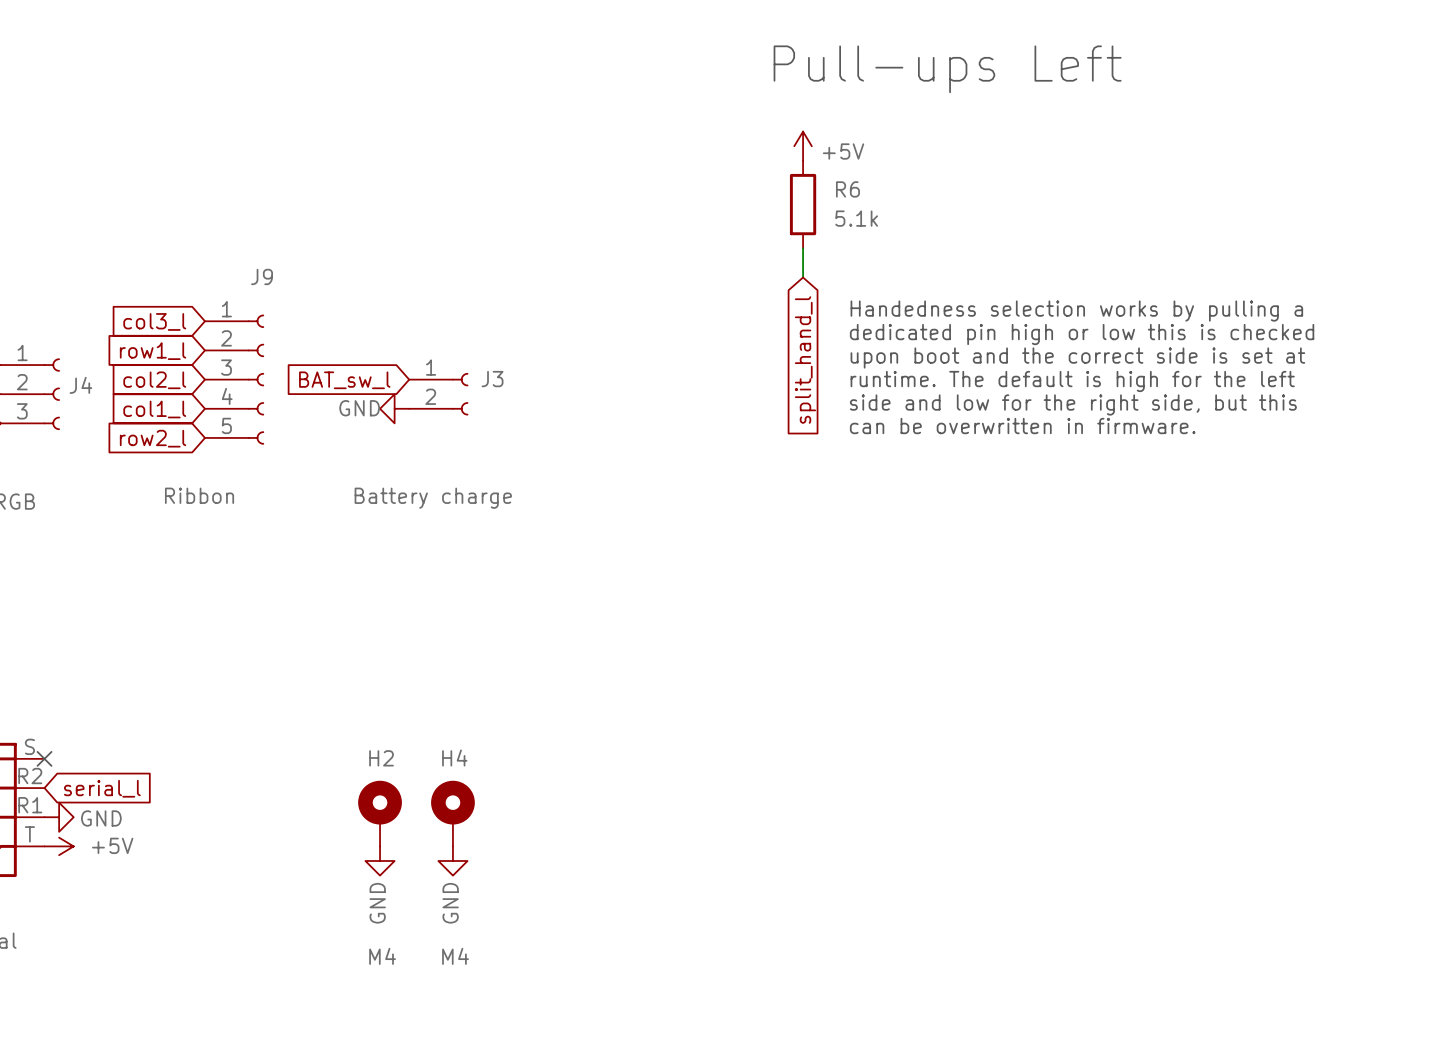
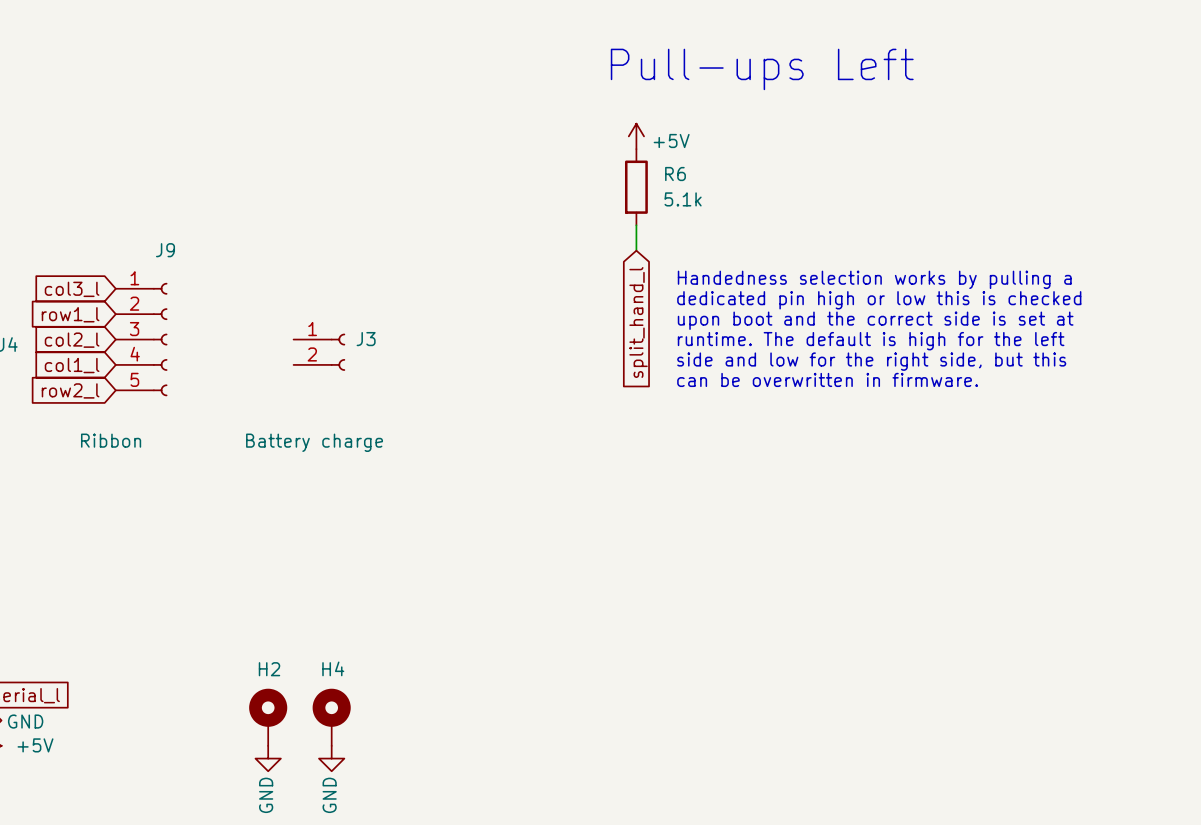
global label: BAT_sw_l (344, 380) -> none
power symbol: GND (394, 408) -> none

